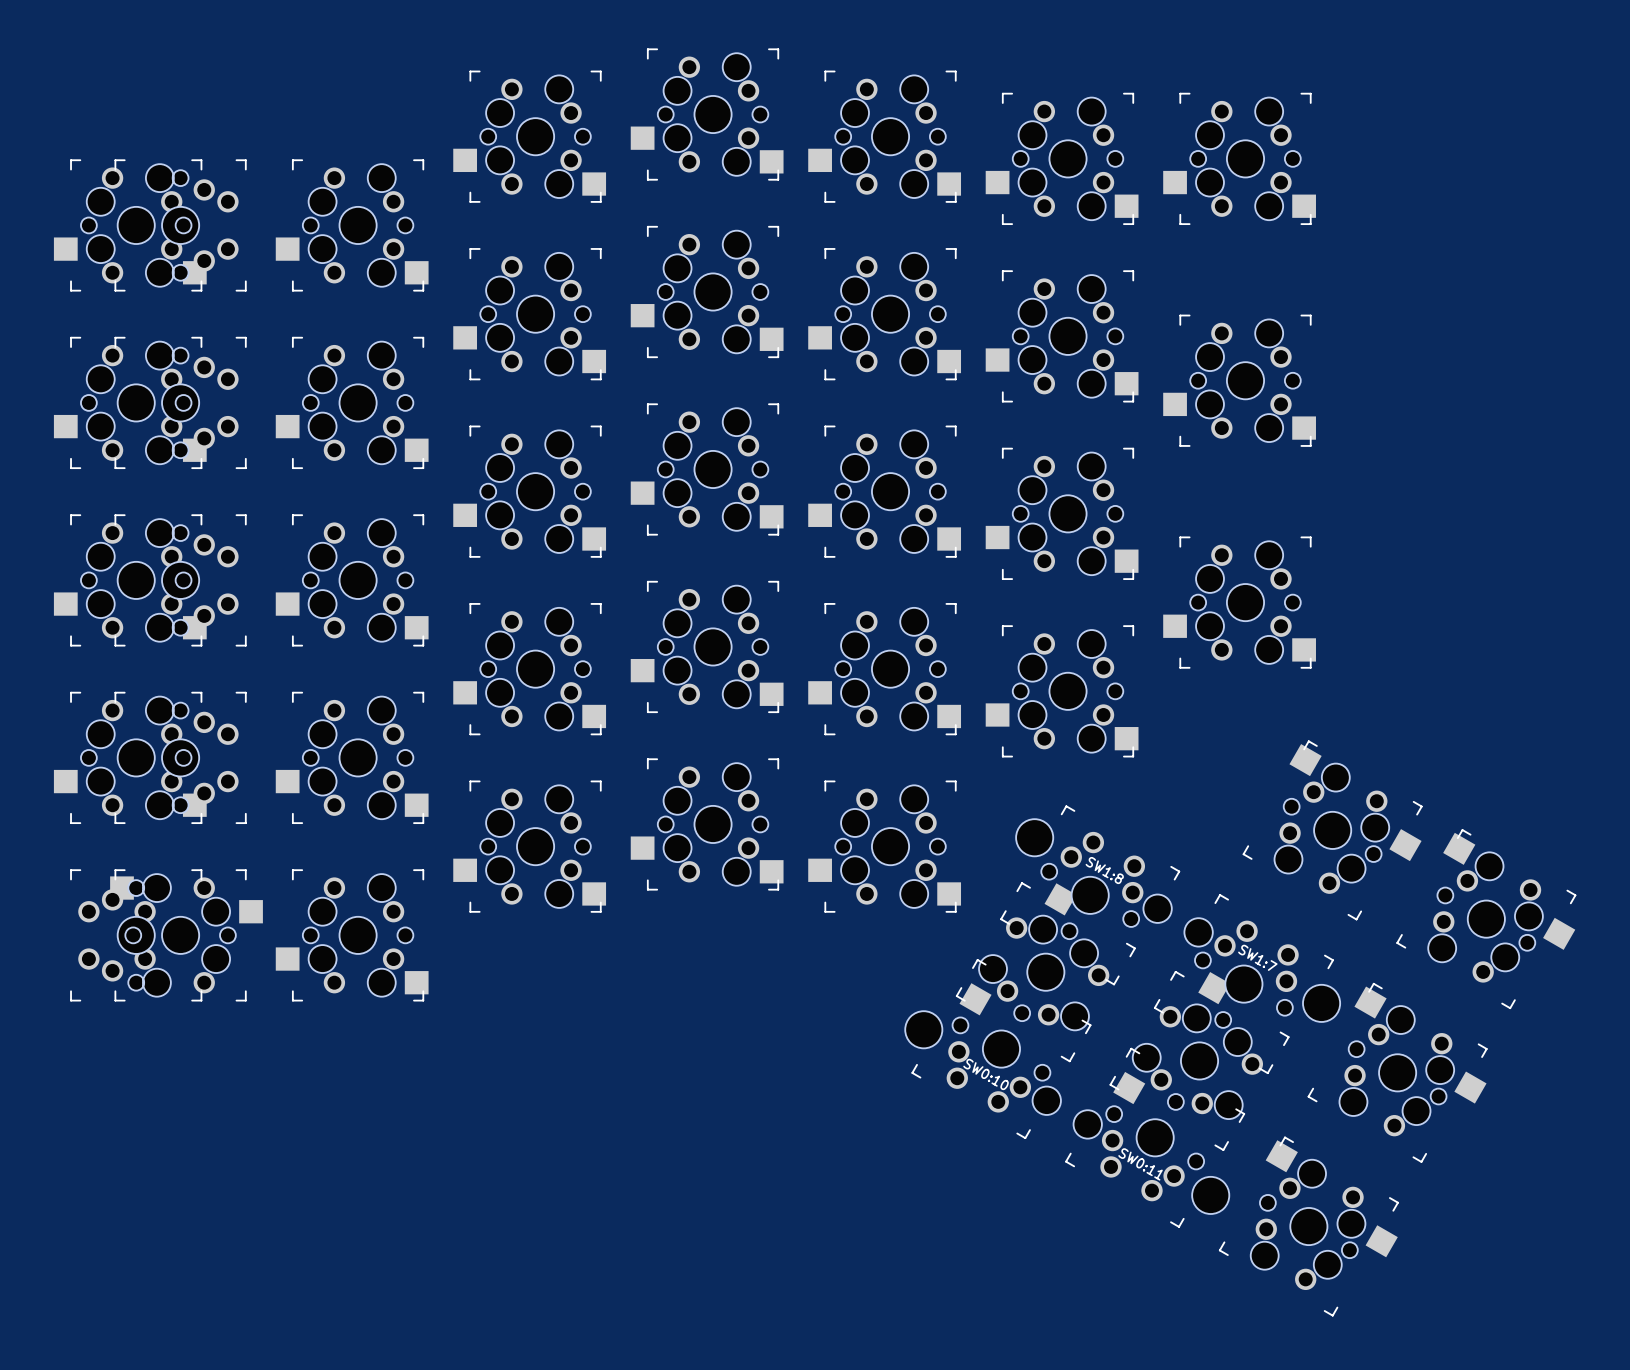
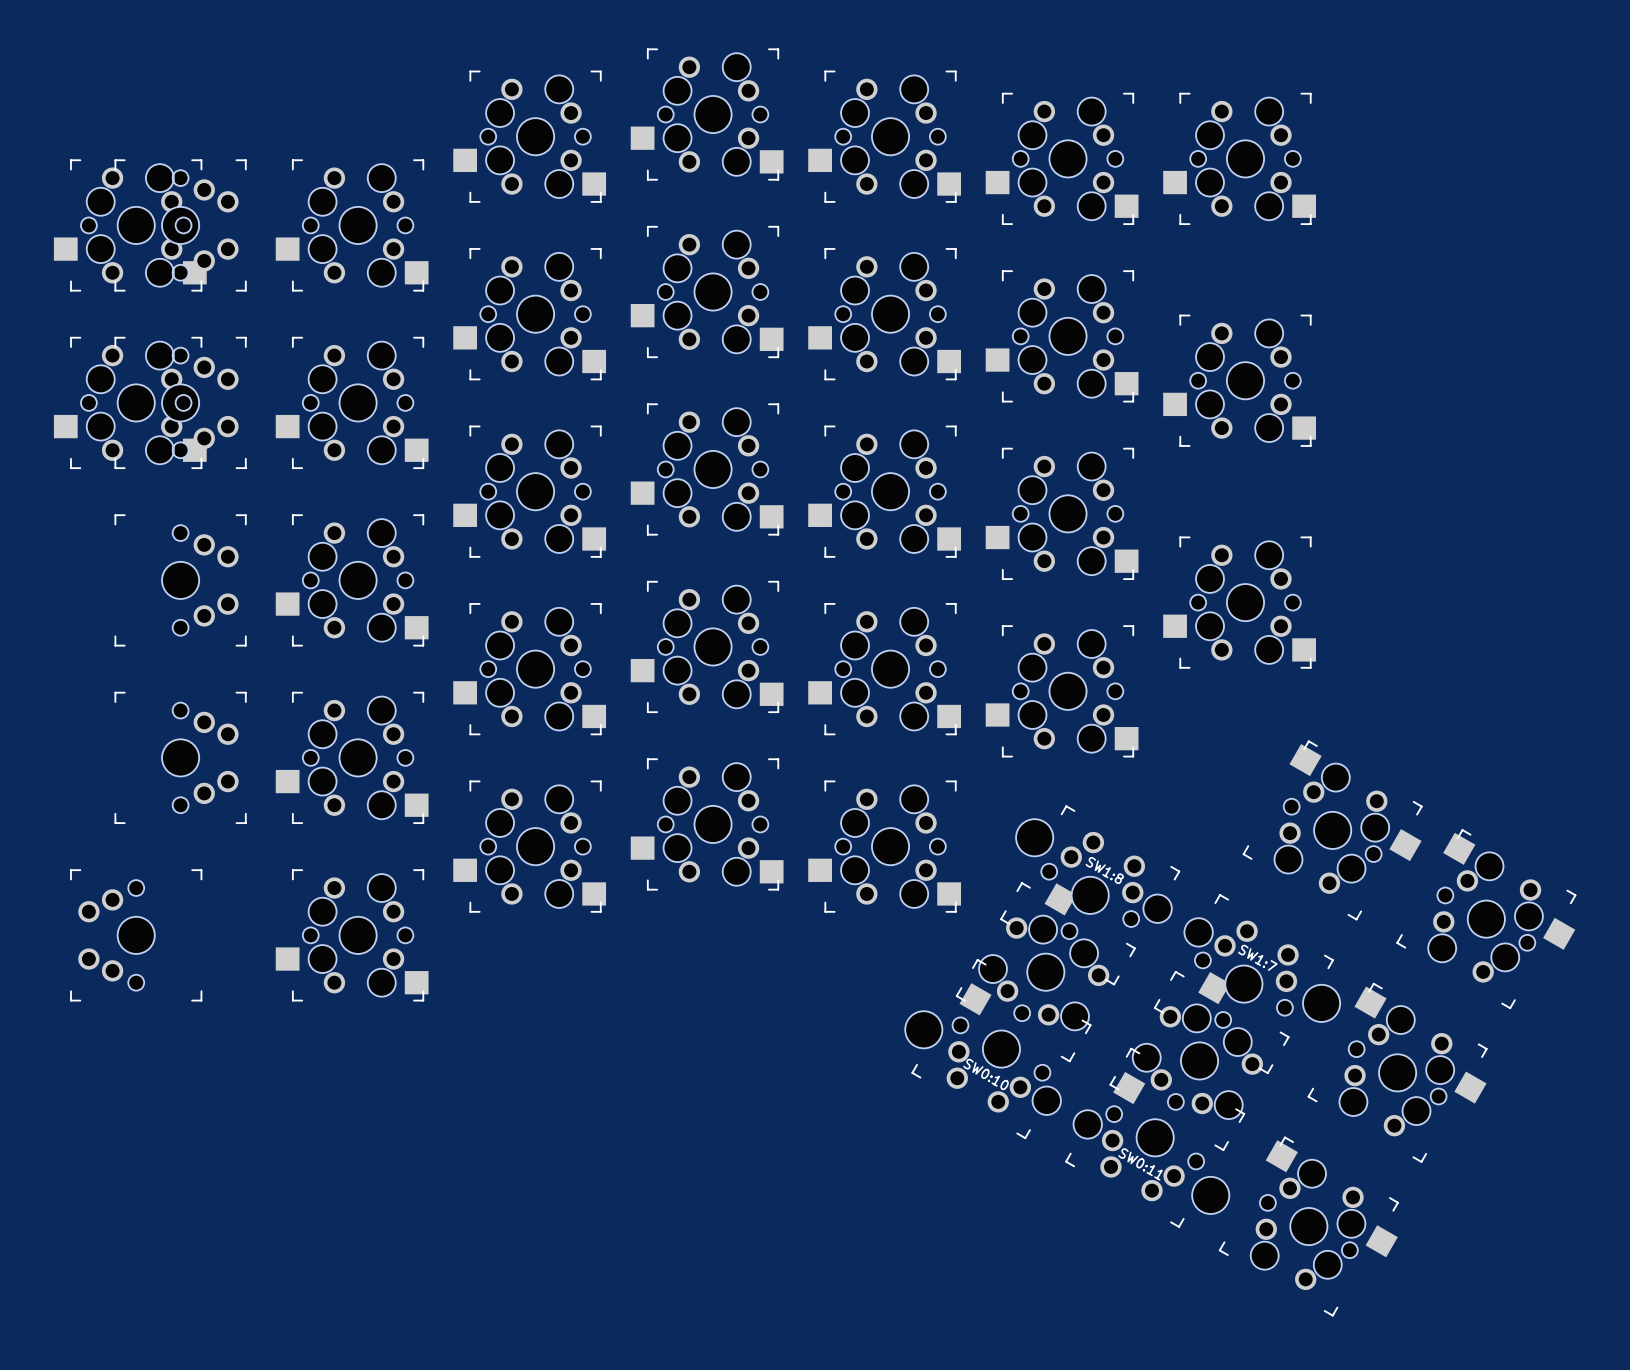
part: (130, 580) -> none
part: (130, 757) -> none
part: (186, 935) -> none

